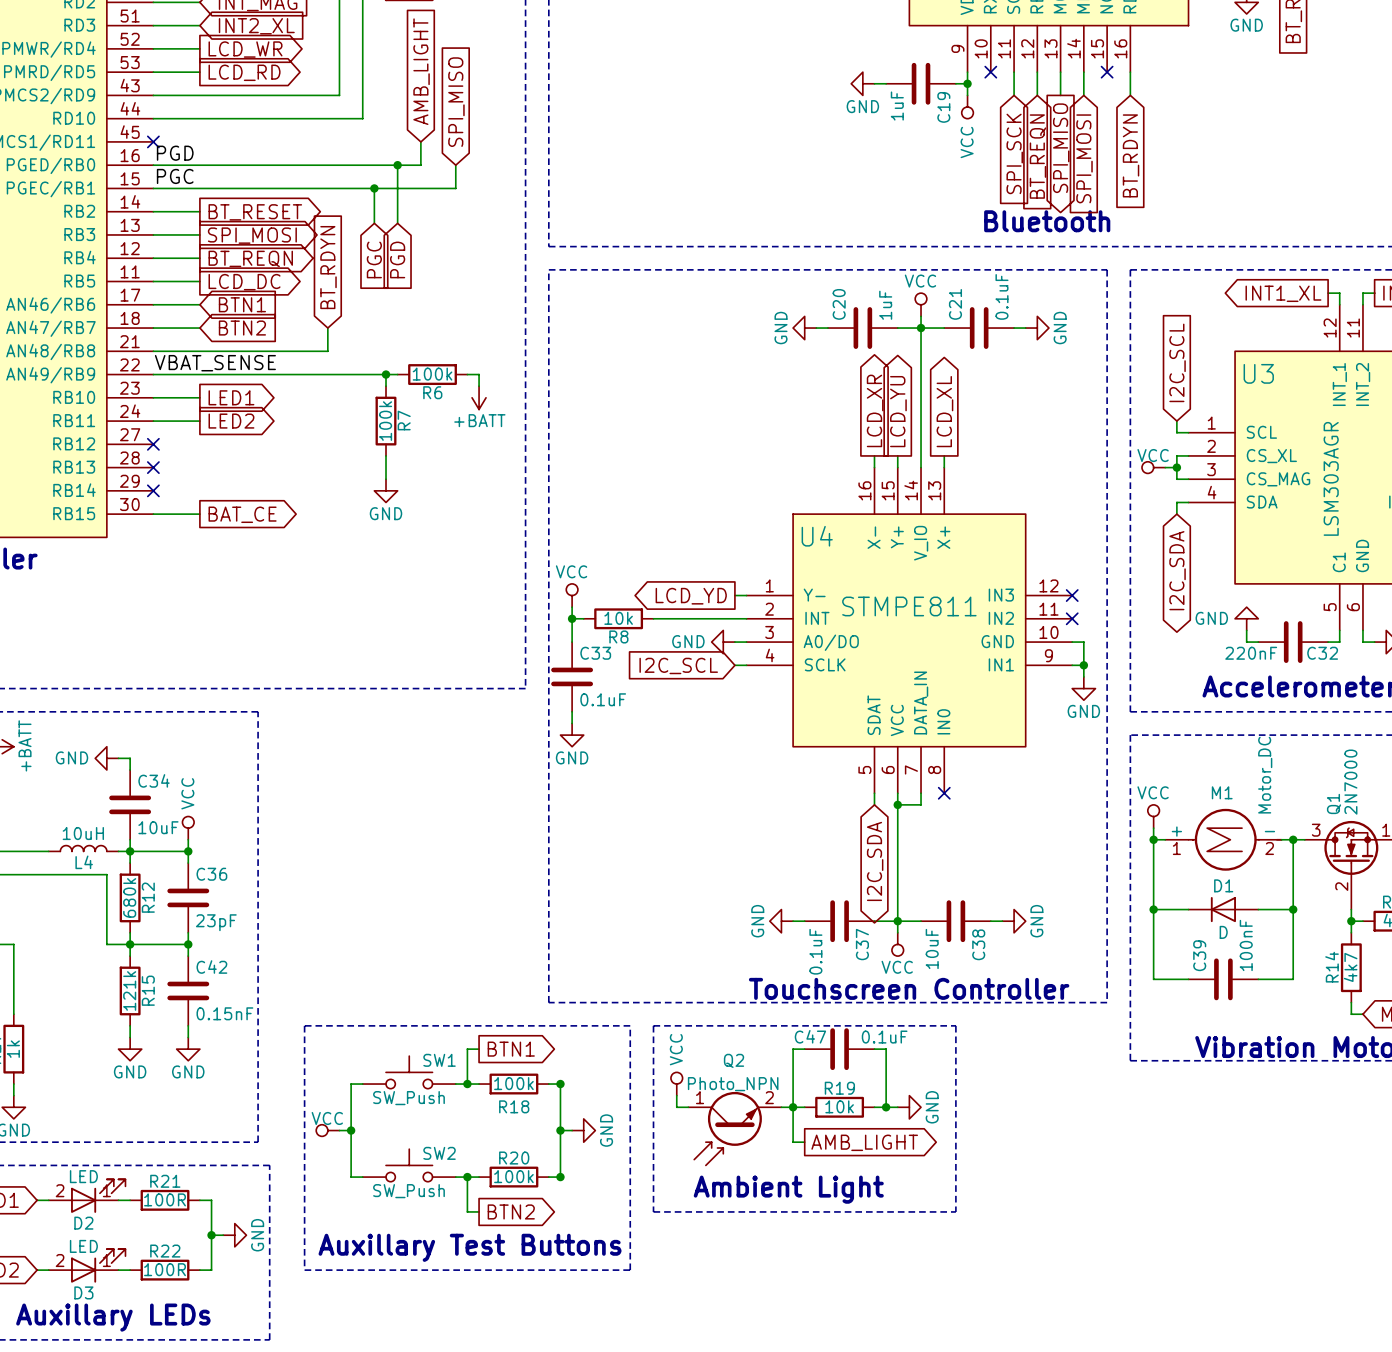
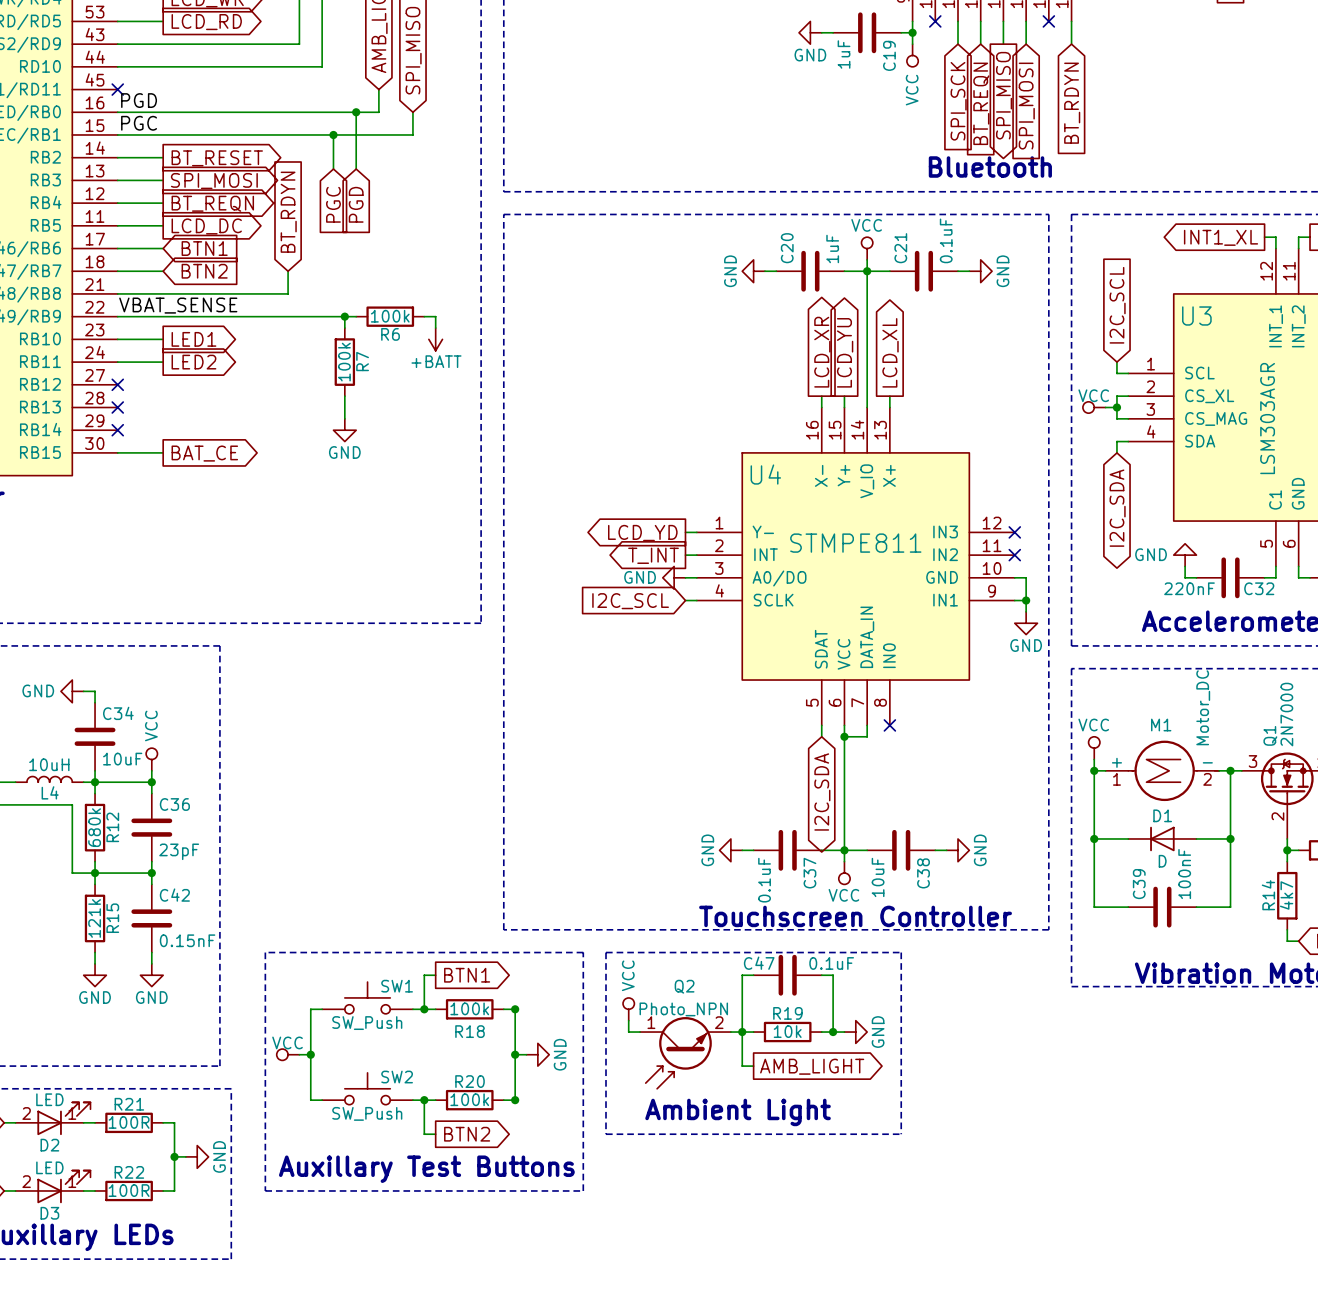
power symbol: VCC (572, 595) -> none
wire: (572, 607) (572, 642) -> none
wire: (572, 618) (583, 618) -> none
junction: (572, 618) -> none
R8: 10k (618, 618) -> none
wire: (653, 618) (734, 618) -> none
global label: none -> T_INT (653, 555)
C33: 0.1uF (572, 676) -> none
wire: (572, 711) (572, 723) -> none
power symbol: GND (572, 735) -> none

